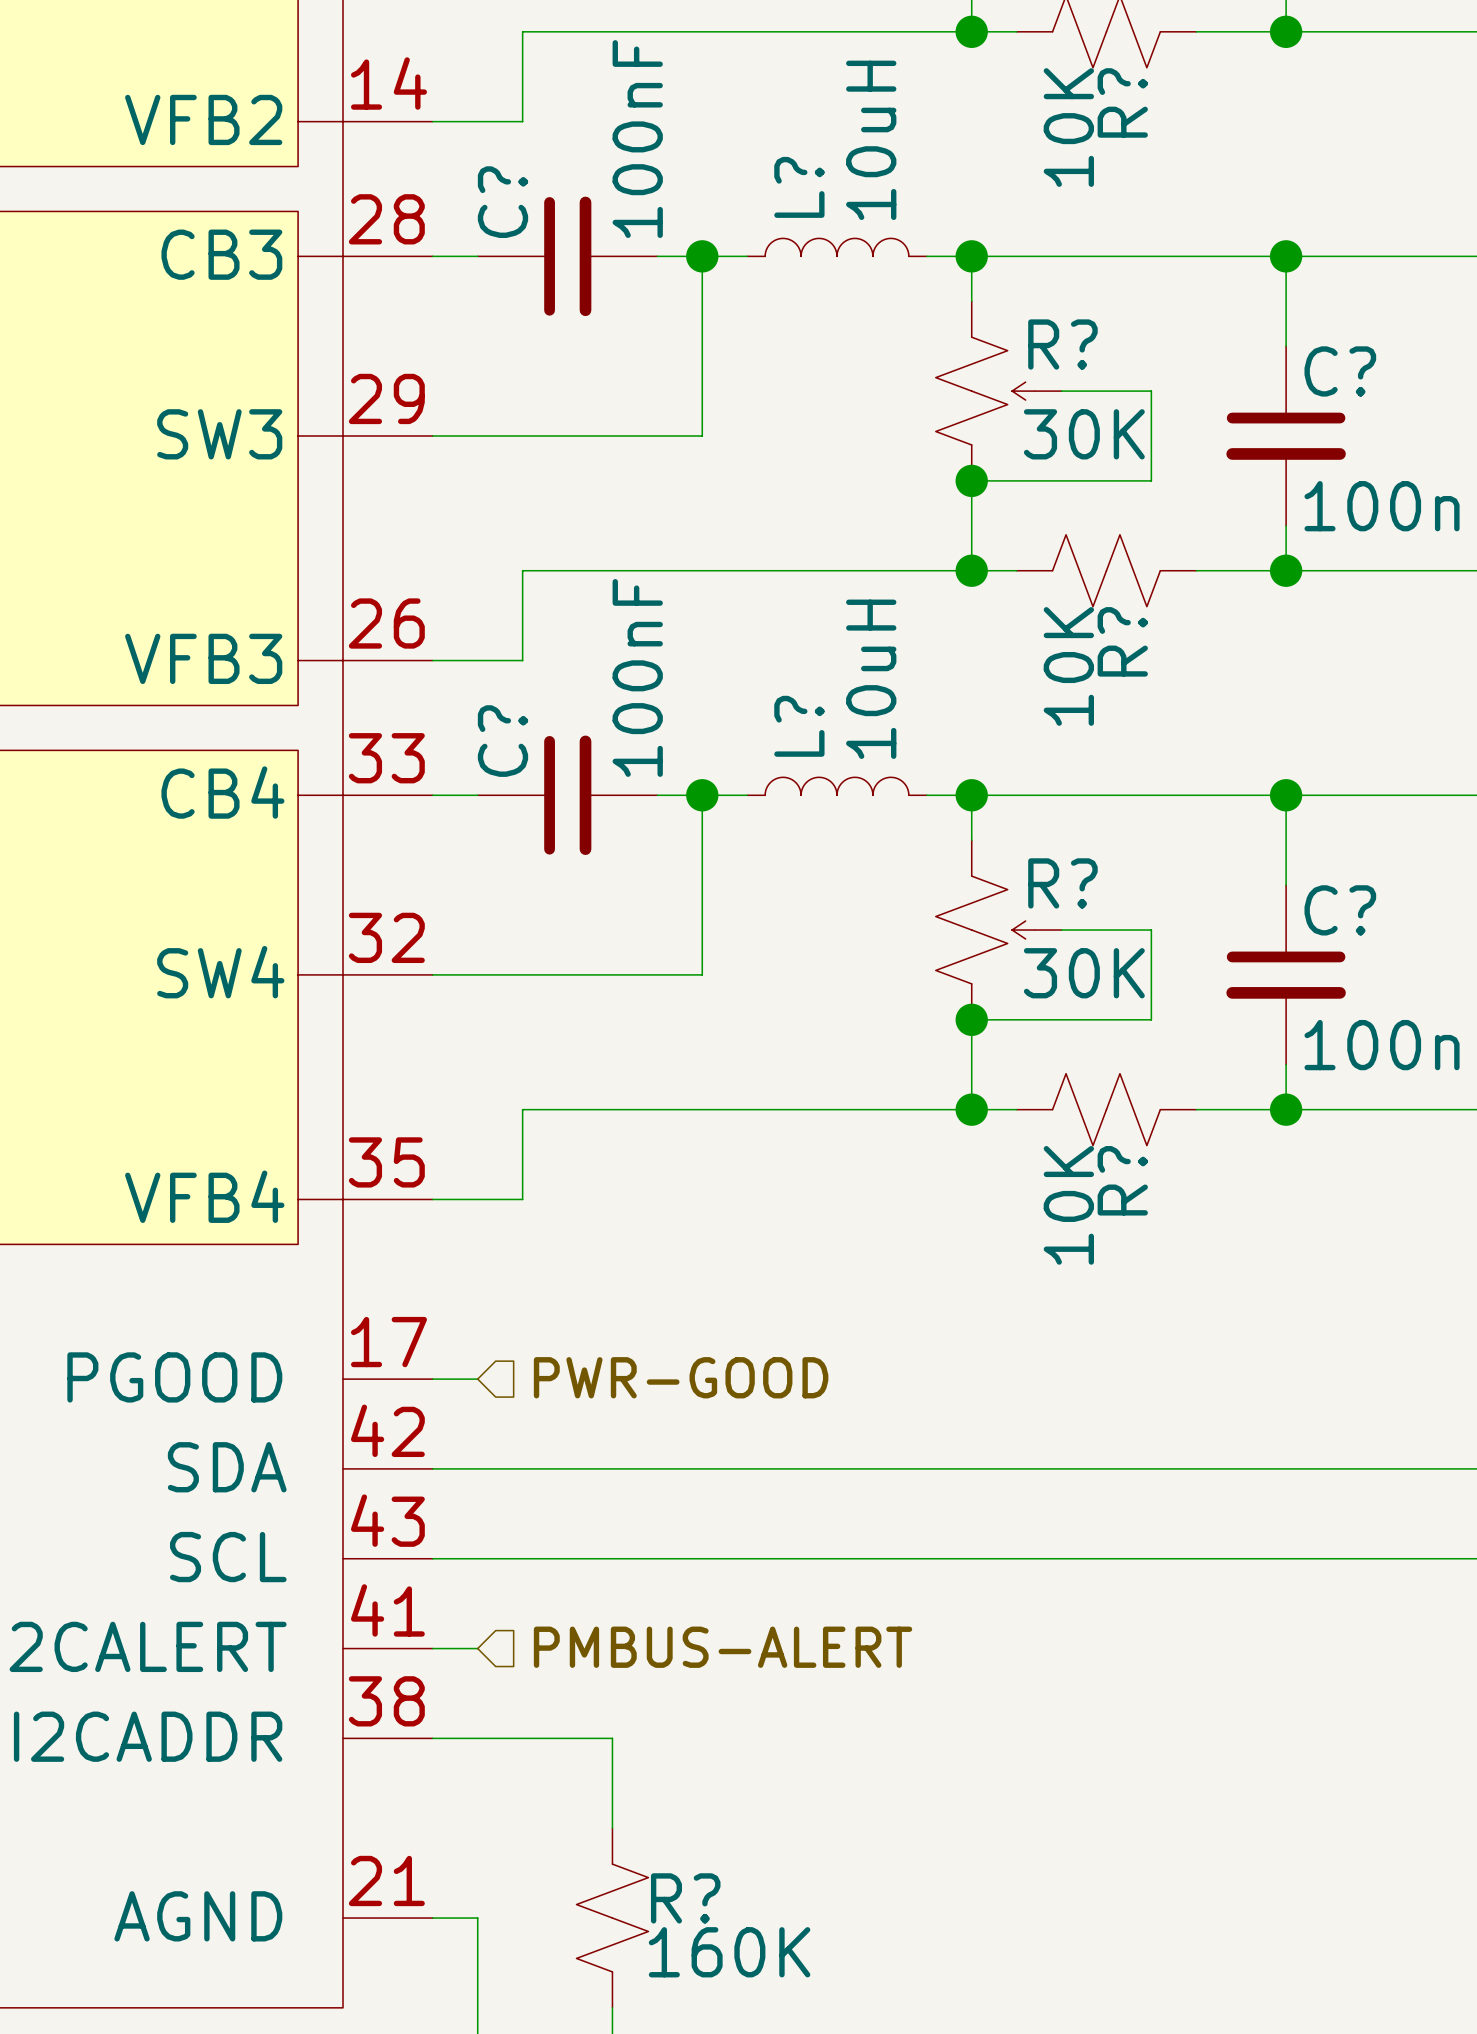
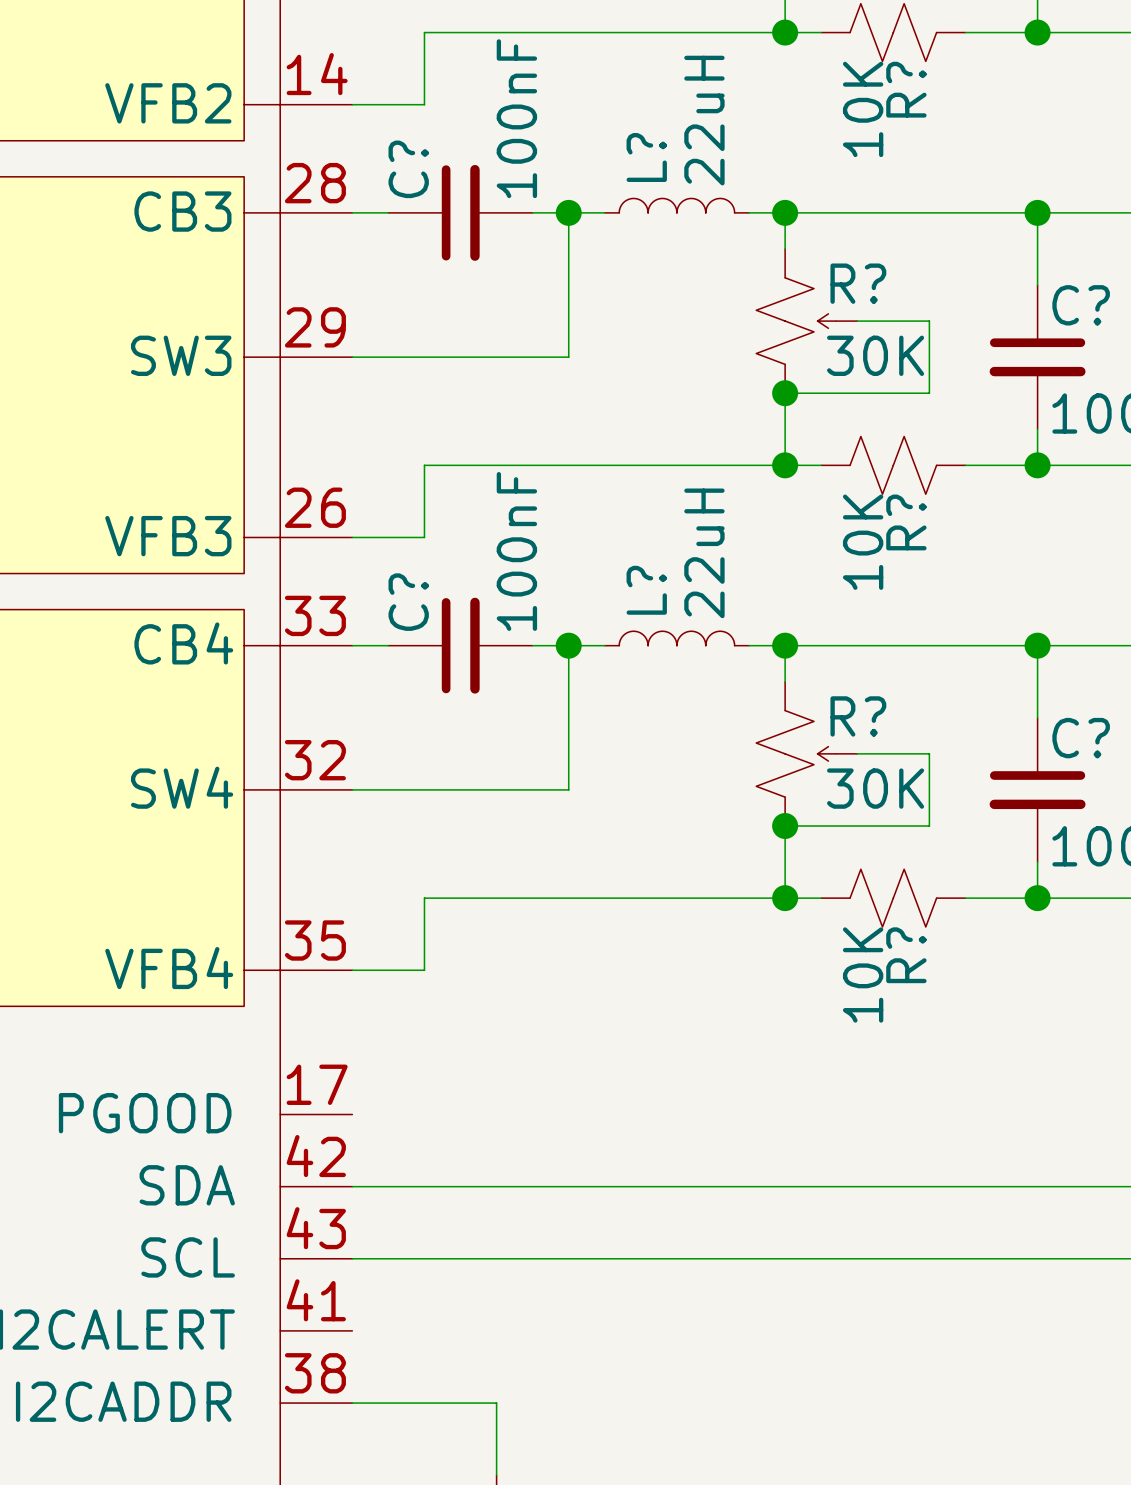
L? value: 10uH (871, 140) -> 22uH (704, 120)
L? value: 10uH (871, 679) -> 22uH (704, 553)
hierarchical label: PWR-GOOD (681, 1377) -> none
wire: (432, 1379) (477, 1379) -> none
hierarchical label: PMBUS-ALERT (723, 1647) -> none
wire: (432, 1648) (477, 1648) -> none

